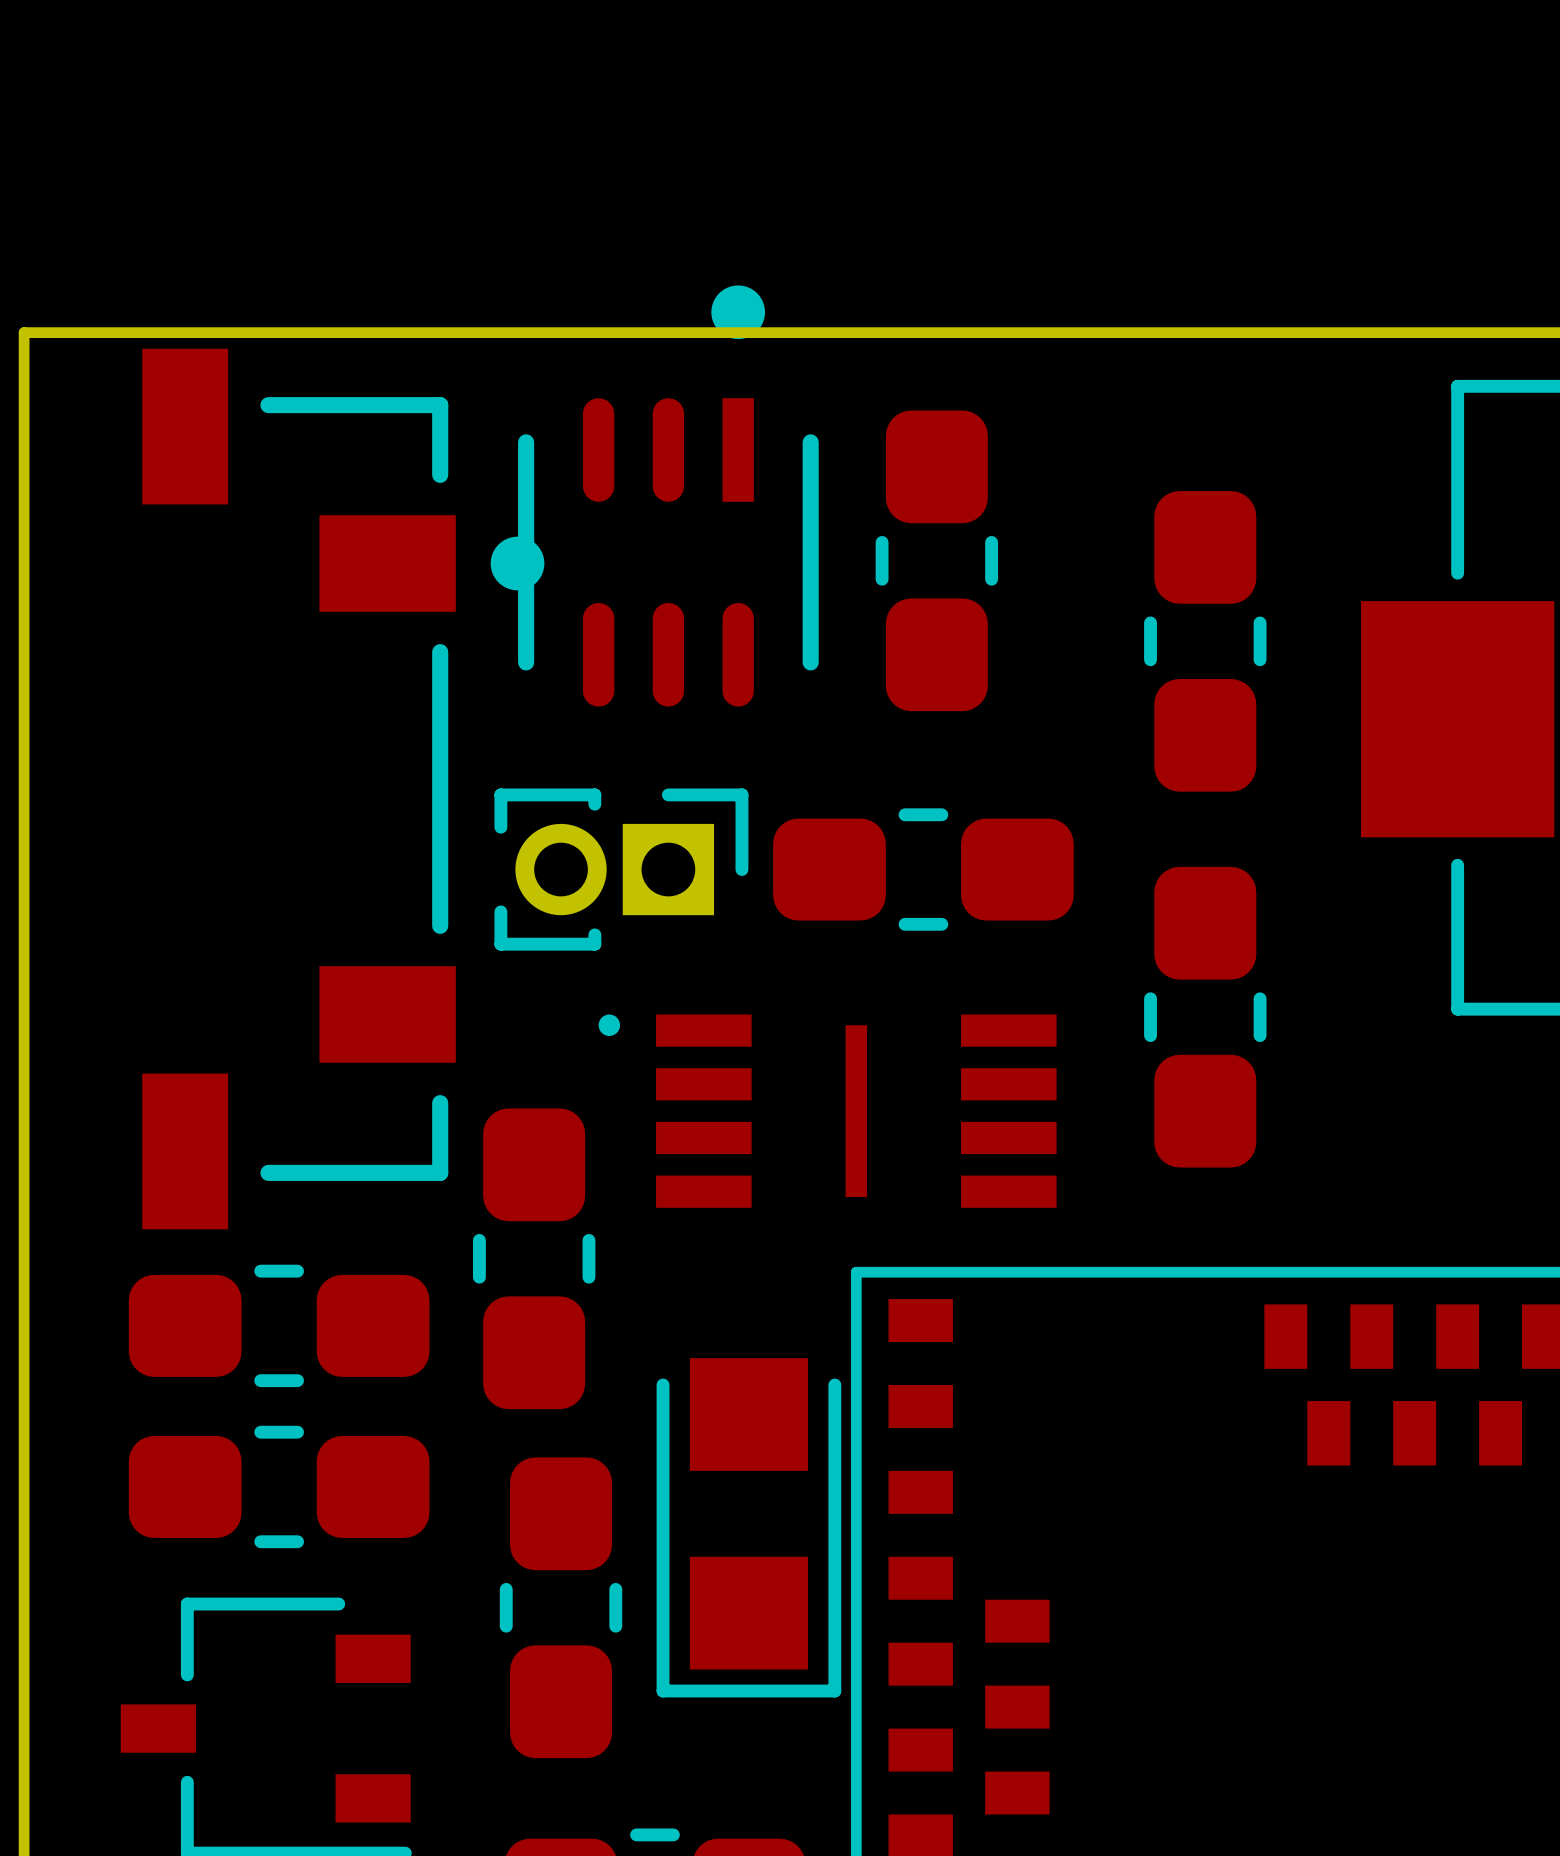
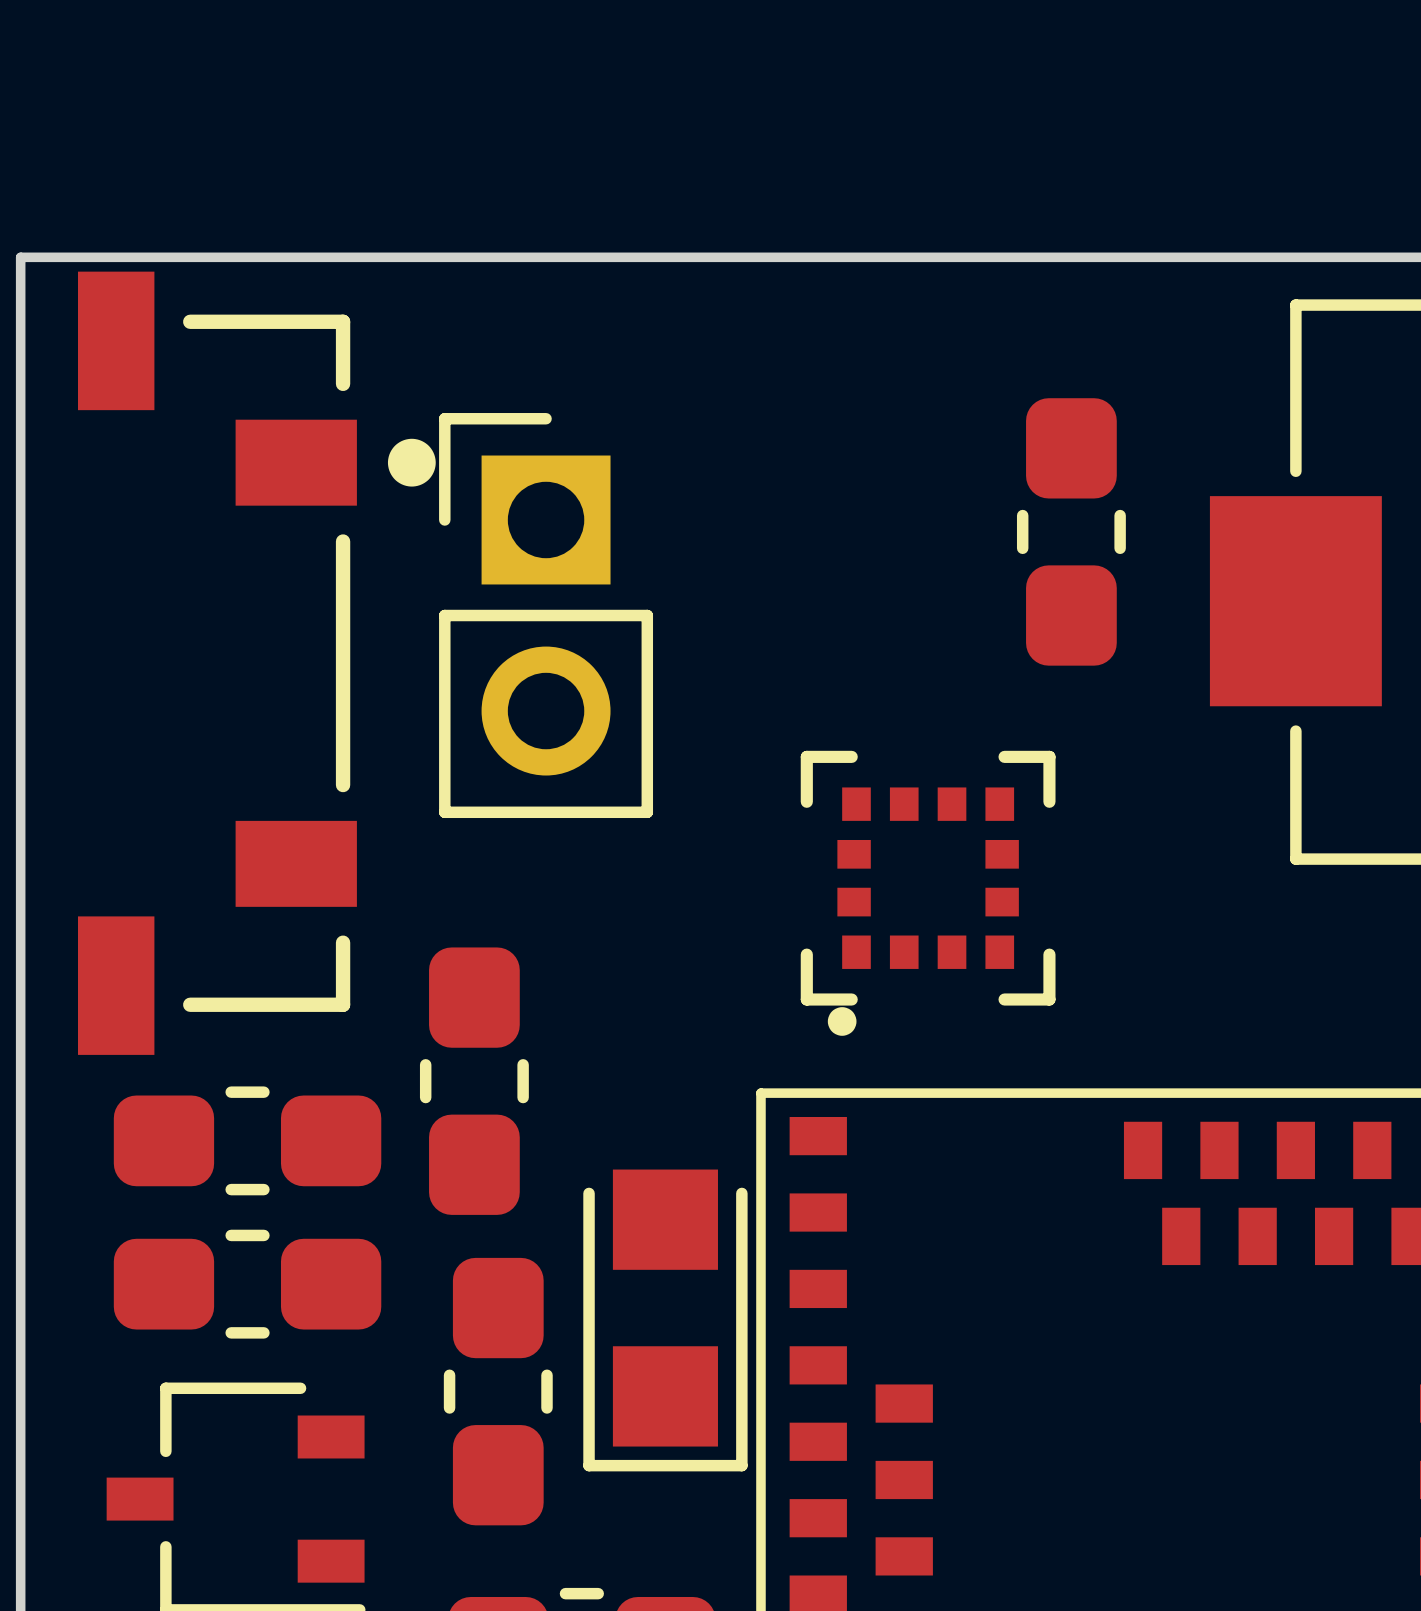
part: (668, 496) -> none
part: (936, 560) -> none
part: none -> (546, 615)
part position: (343, 789) -> (256, 663)
part: (621, 869) -> none
part: (923, 869) -> none
part: (1205, 1017) -> none
part: none -> (928, 893)
part: (827, 1111) -> none

